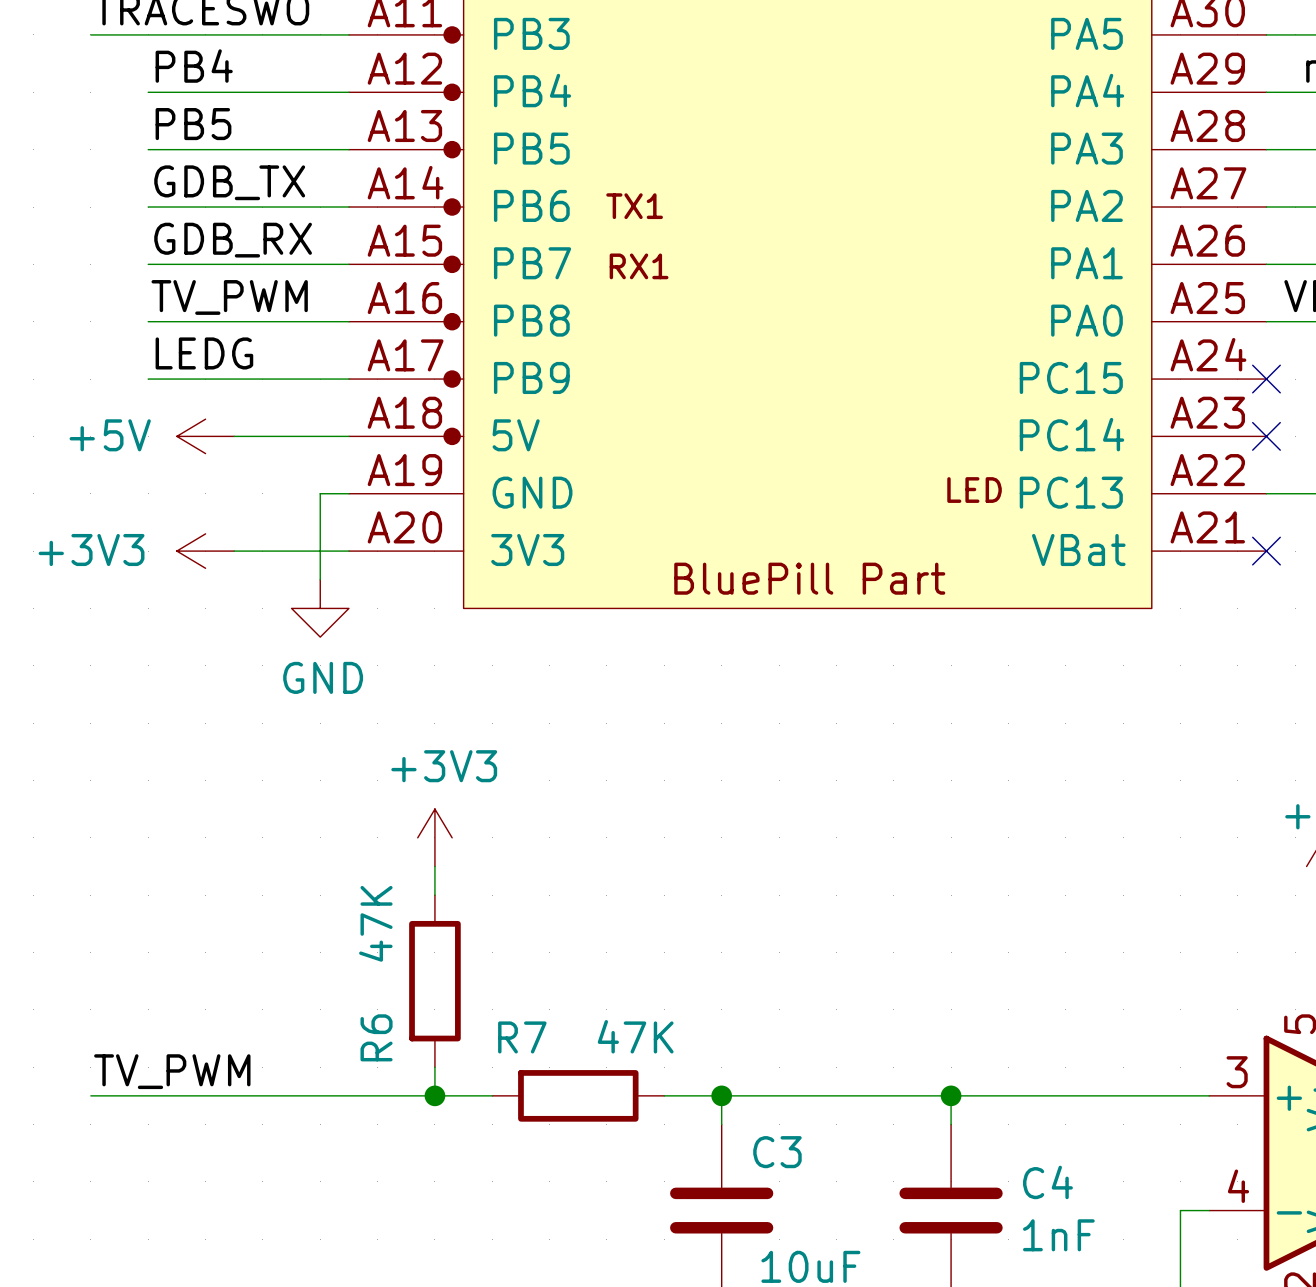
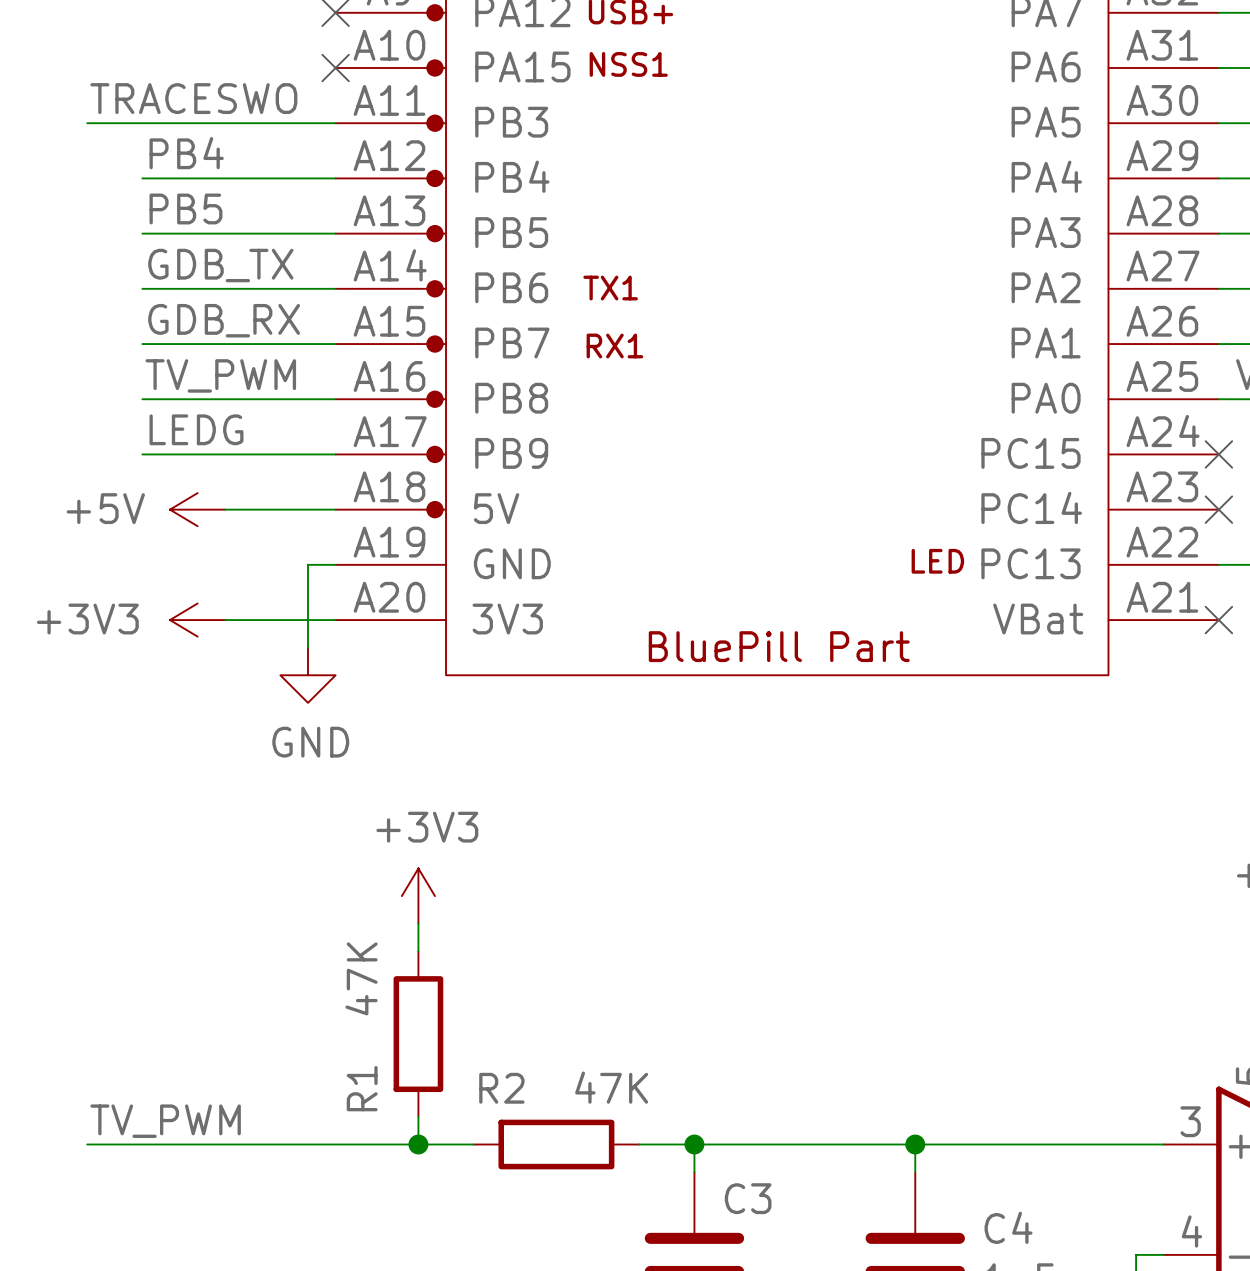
R6 name: R6 (376, 1037) -> R1 (362, 1088)
R7 name: R7 (522, 1037) -> R2 (501, 1088)

